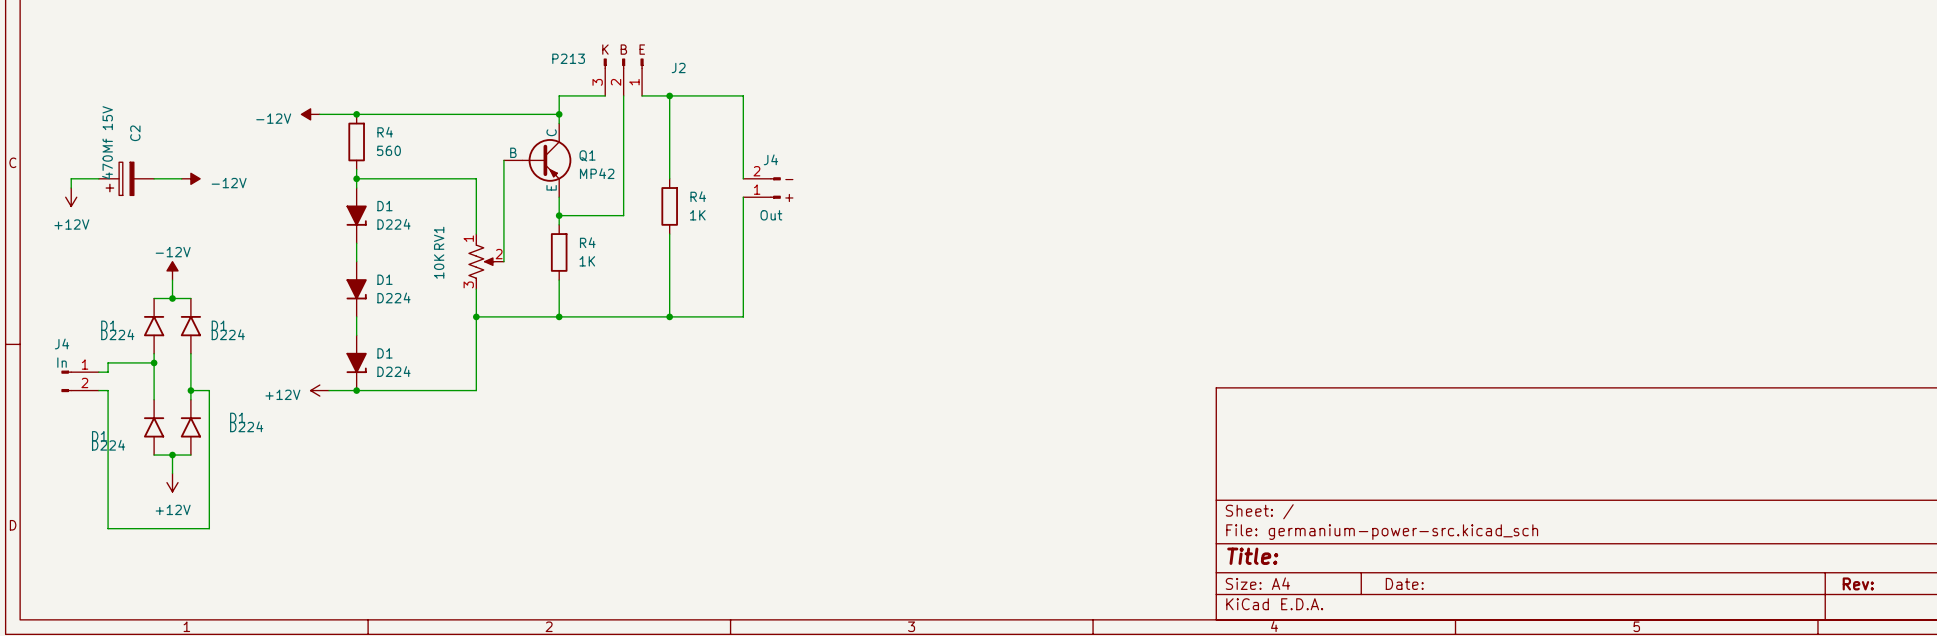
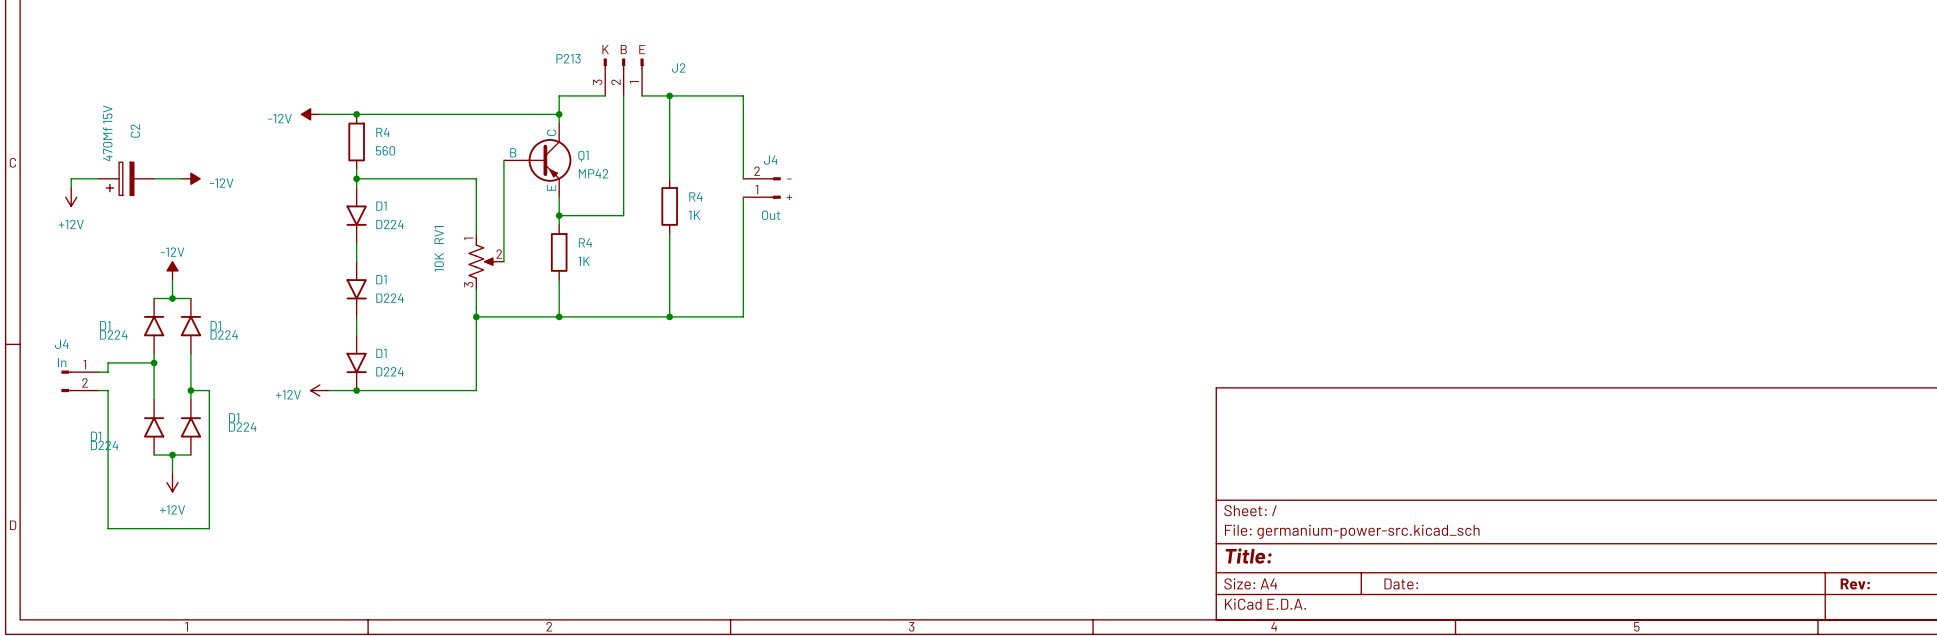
D1 symbol: [346, 188, 367, 244] -> [346, 188, 367, 244]
D1 symbol: [346, 261, 367, 317] -> [346, 261, 367, 317]
D1 symbol: [346, 335, 367, 391] -> [346, 335, 367, 391]

